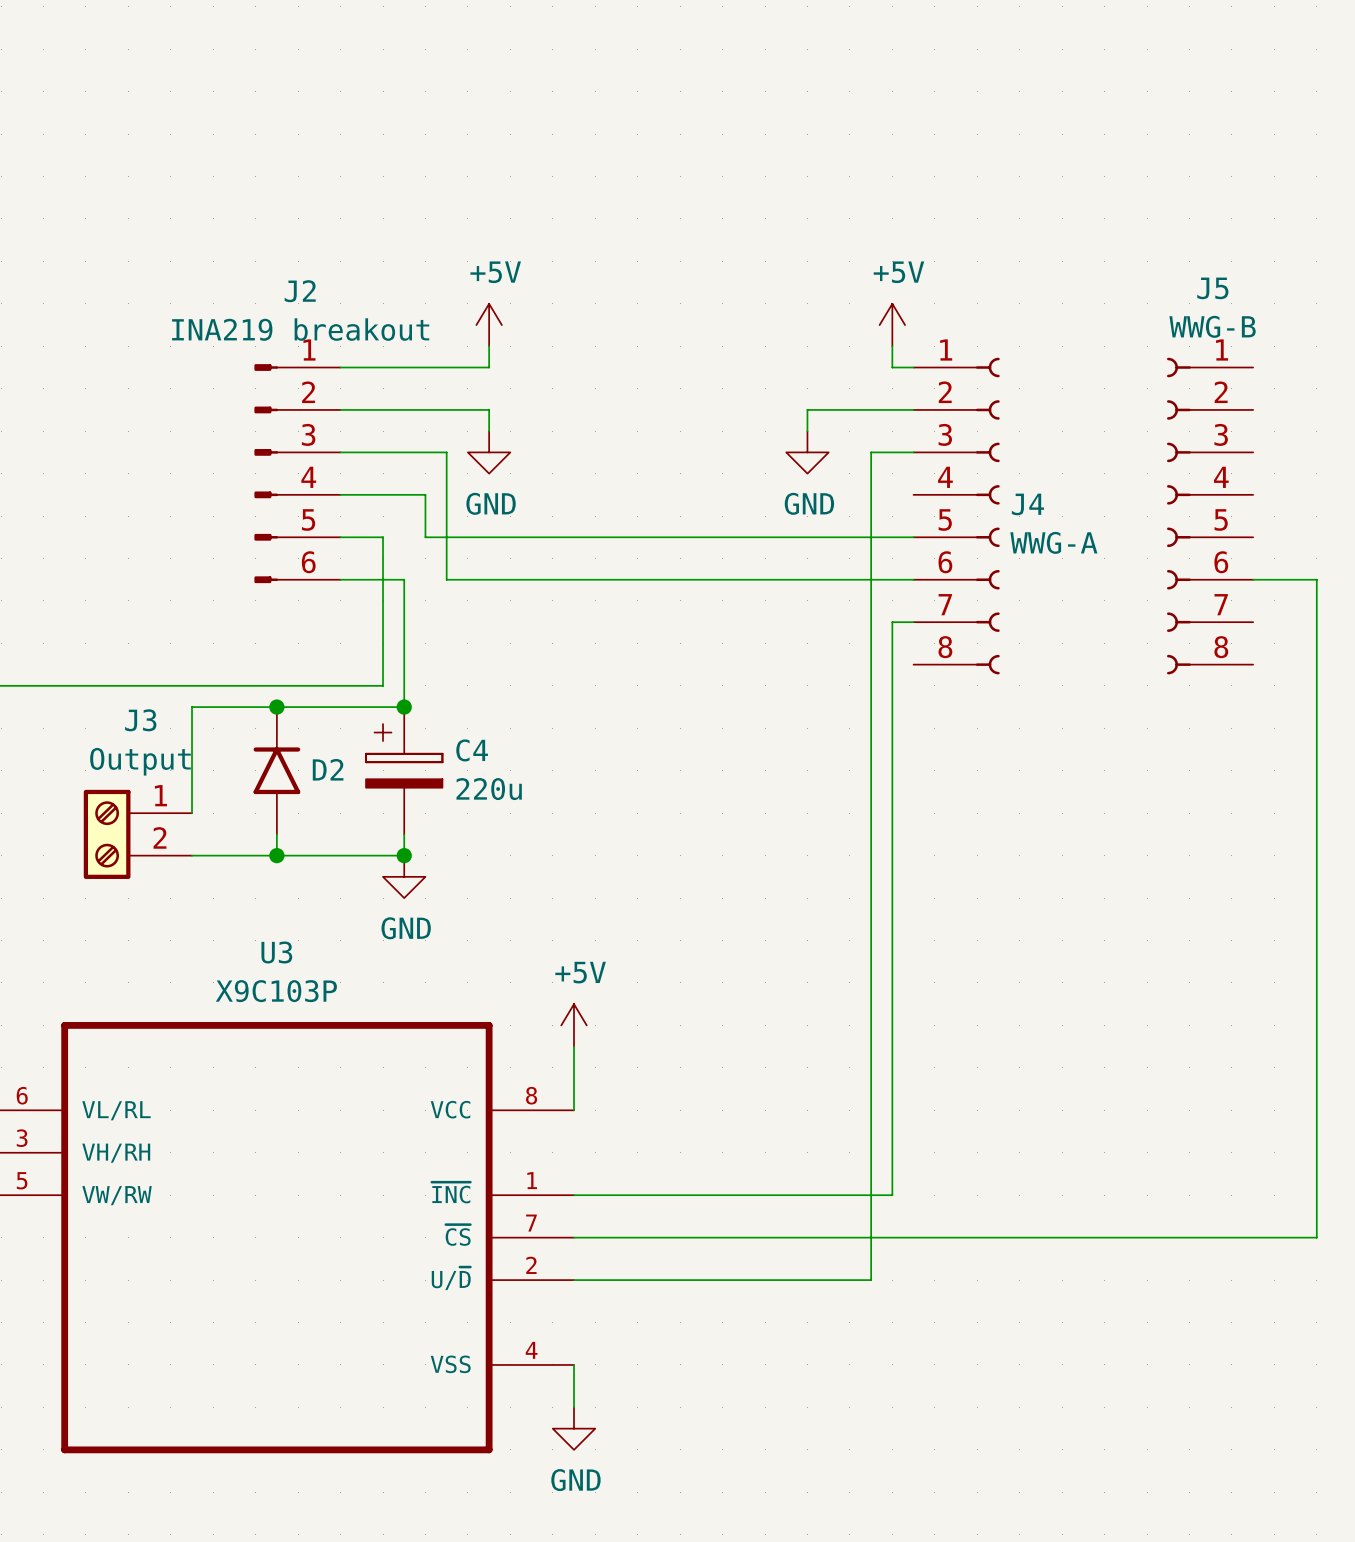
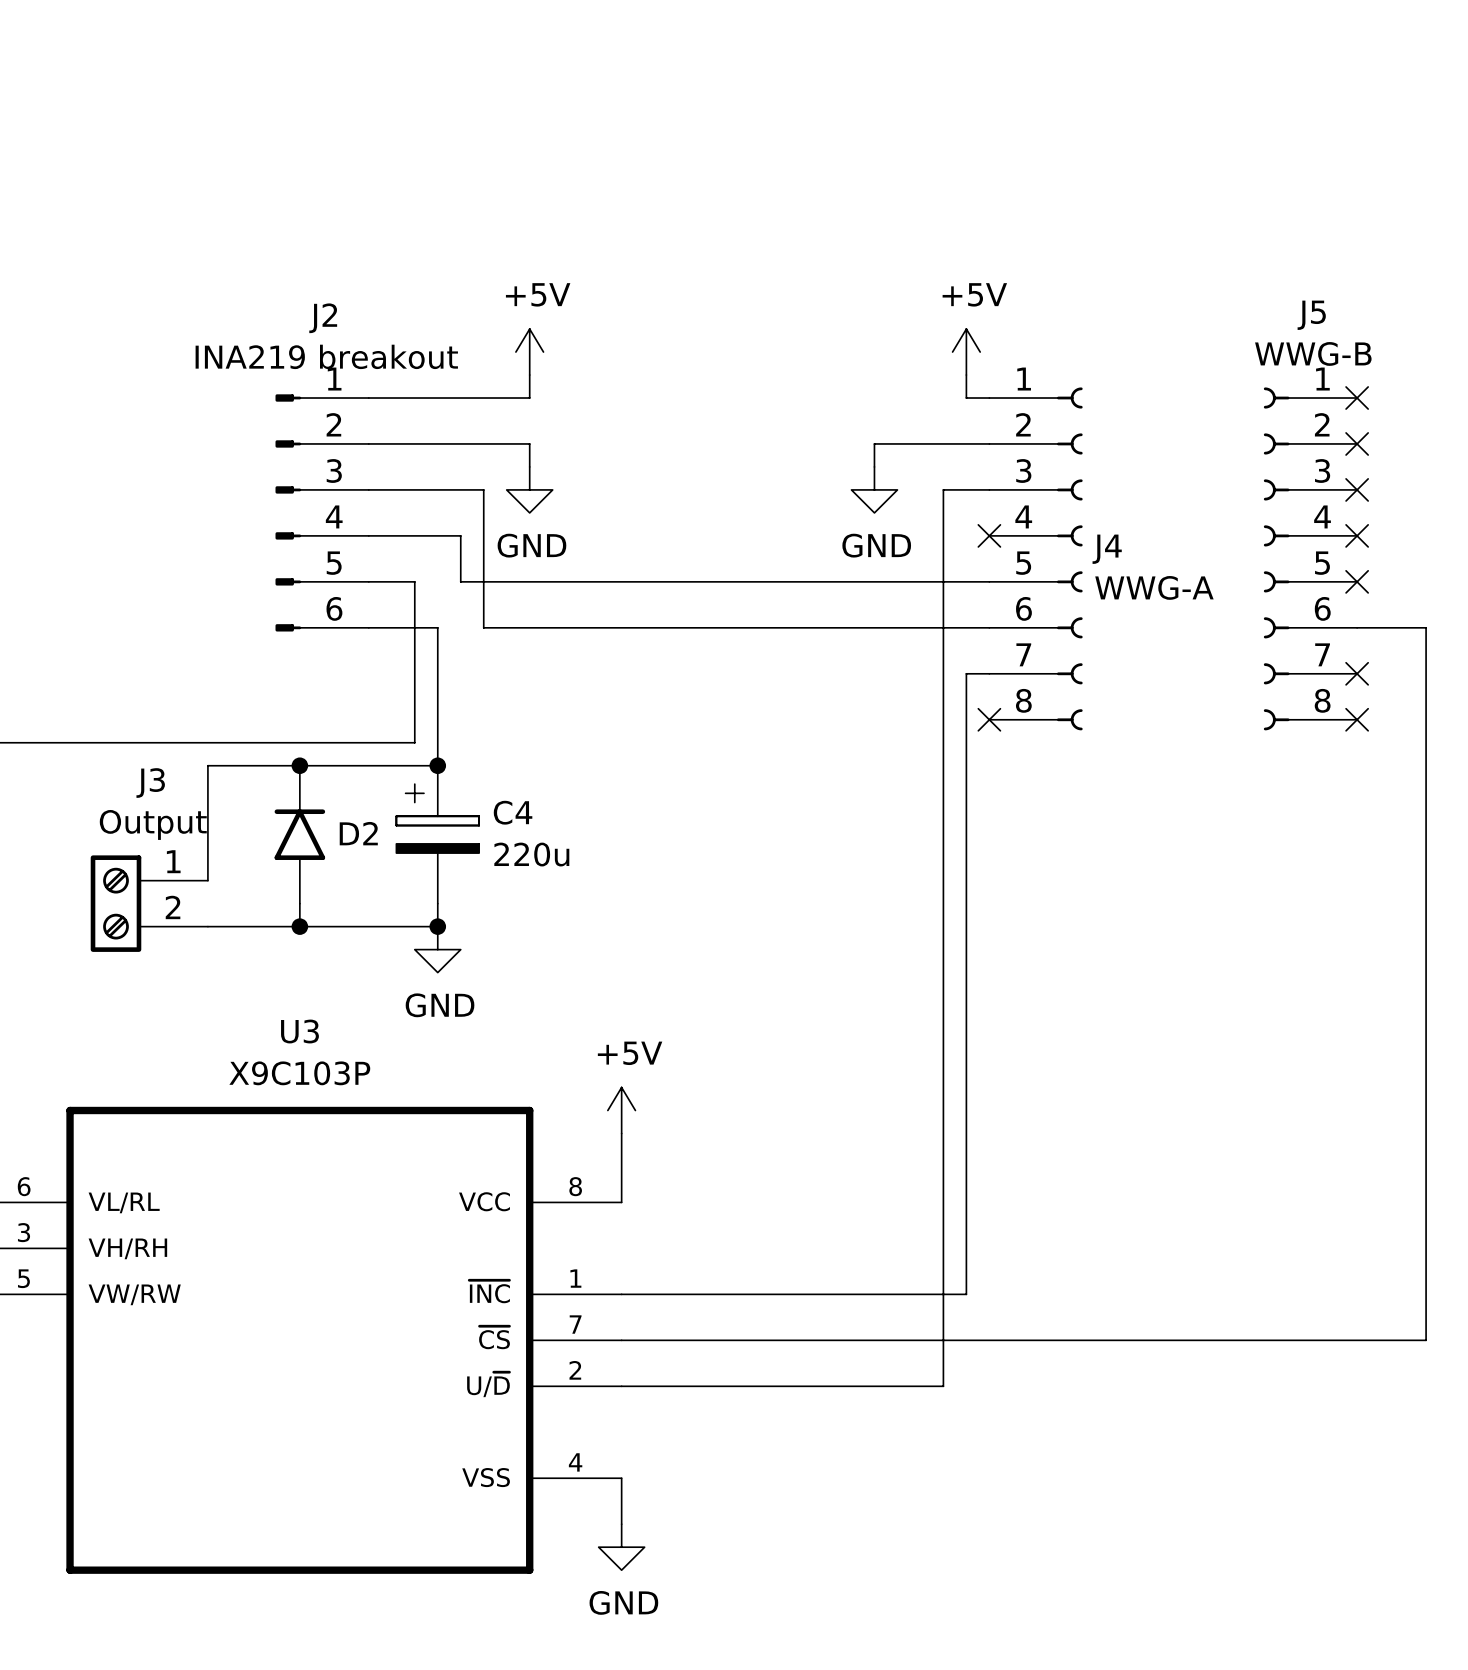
no-connect mark: none -> (1357, 398)
no-connect mark: none -> (1357, 443)
no-connect mark: none -> (1357, 489)
no-connect mark: none -> (989, 535)
no-connect mark: none -> (1357, 535)
no-connect mark: none -> (1357, 581)
no-connect mark: none -> (1357, 673)
no-connect mark: none -> (989, 719)
no-connect mark: none -> (1357, 719)

